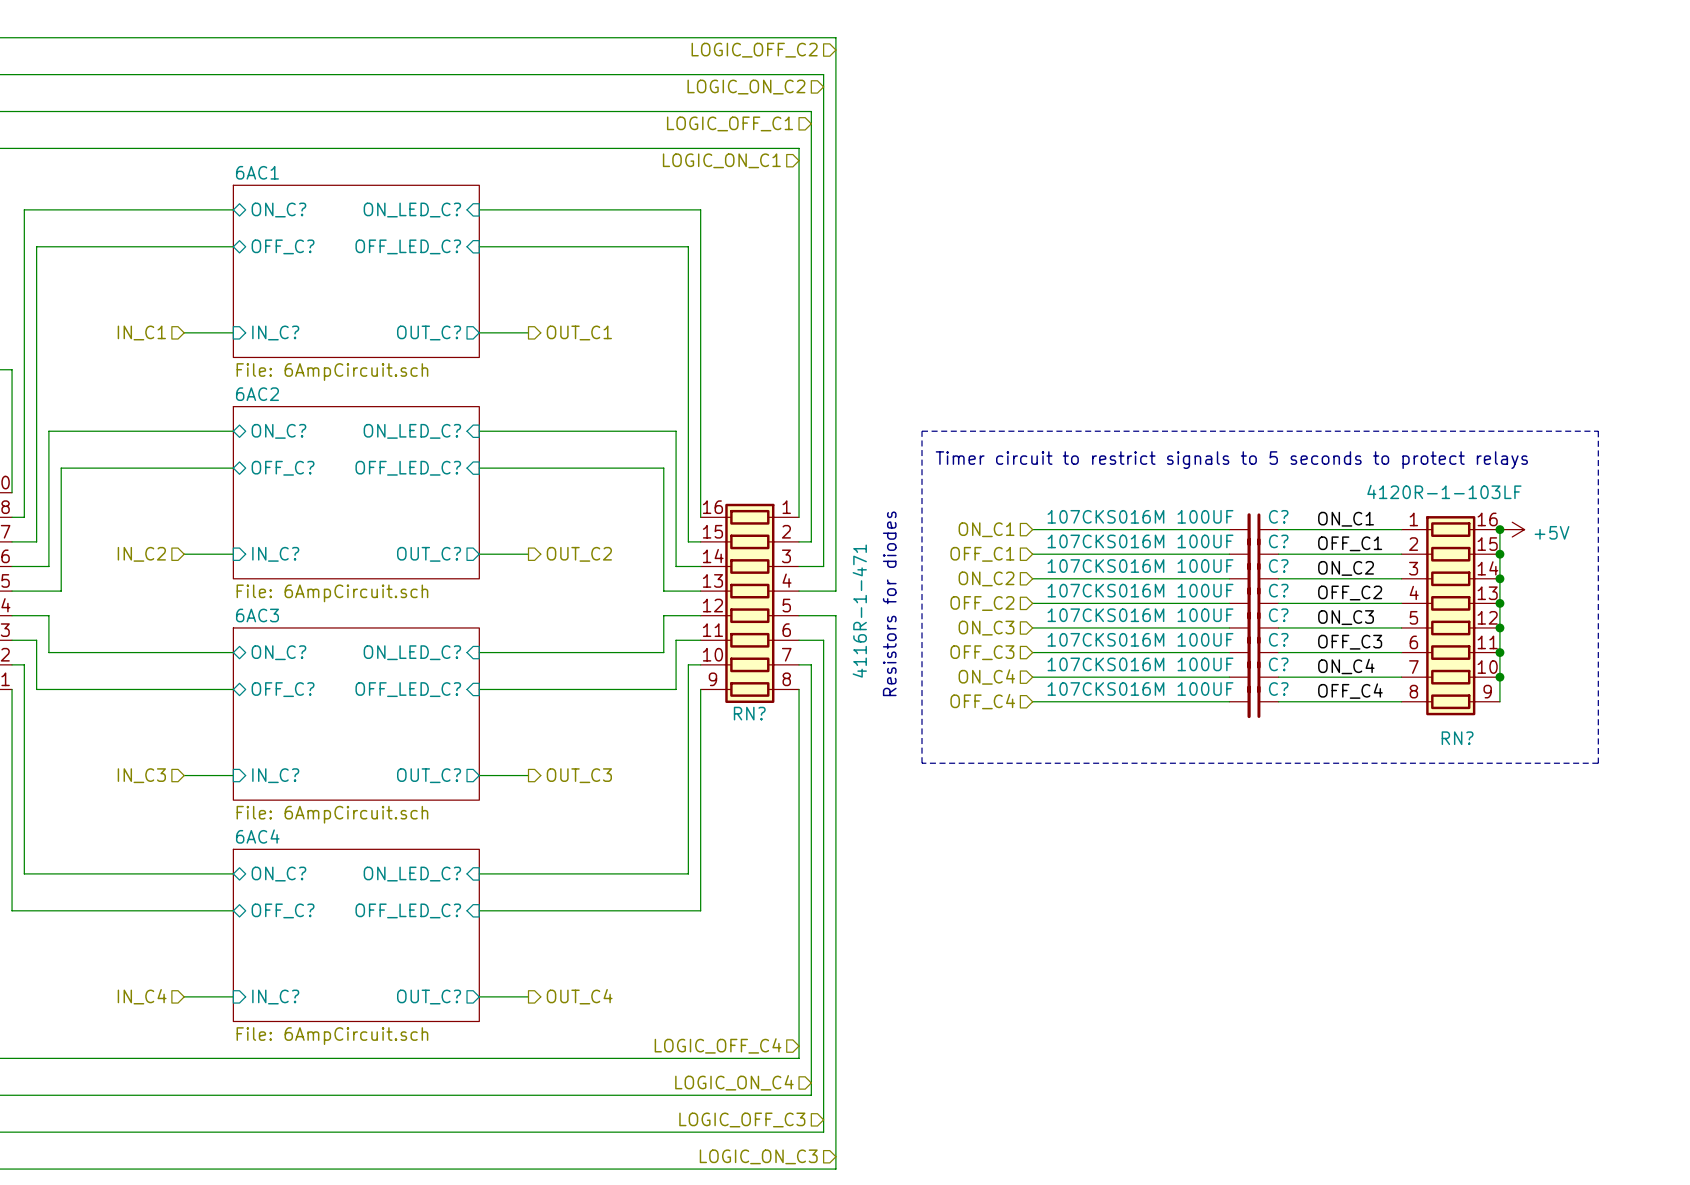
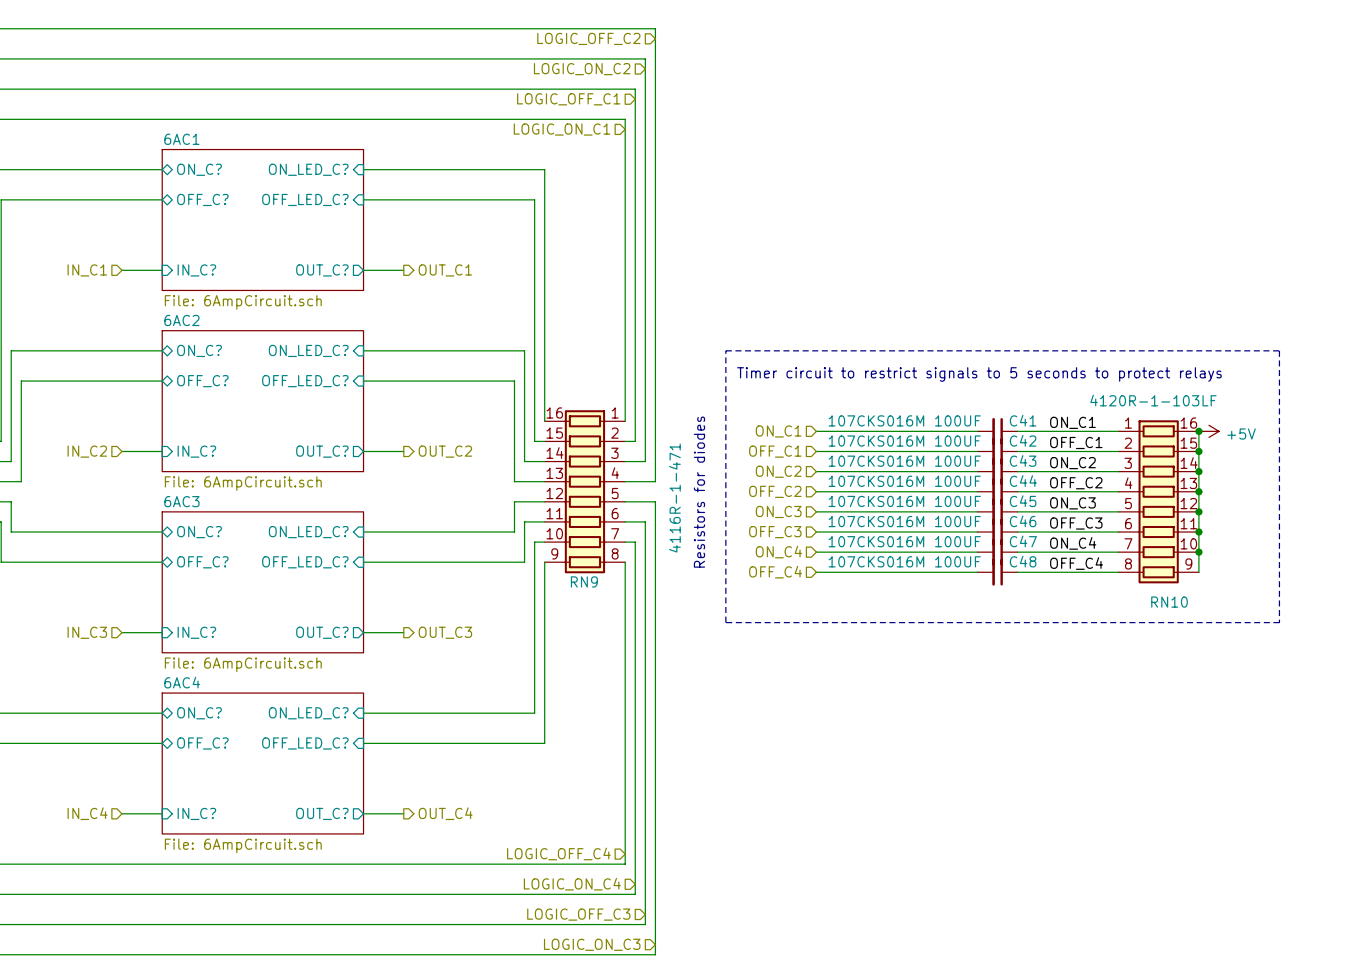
C? name: C? (1278, 516) -> C41 (1023, 420)
C? name: C? (1278, 541) -> C42 (1023, 440)
C? name: C? (1278, 566) -> C43 (1023, 460)
C? name: C? (1278, 590) -> C44 (1023, 481)
C? name: C? (1278, 615) -> C45 (1023, 501)
C? name: C? (1278, 639) -> C46 (1023, 521)
C? name: C? (1278, 664) -> C47 (1023, 541)
C? name: C? (1278, 689) -> C48 (1023, 561)
RN? name: RN? (749, 713) -> RN9 (584, 581)
RN? name: RN? (1457, 738) -> RN10 (1169, 602)

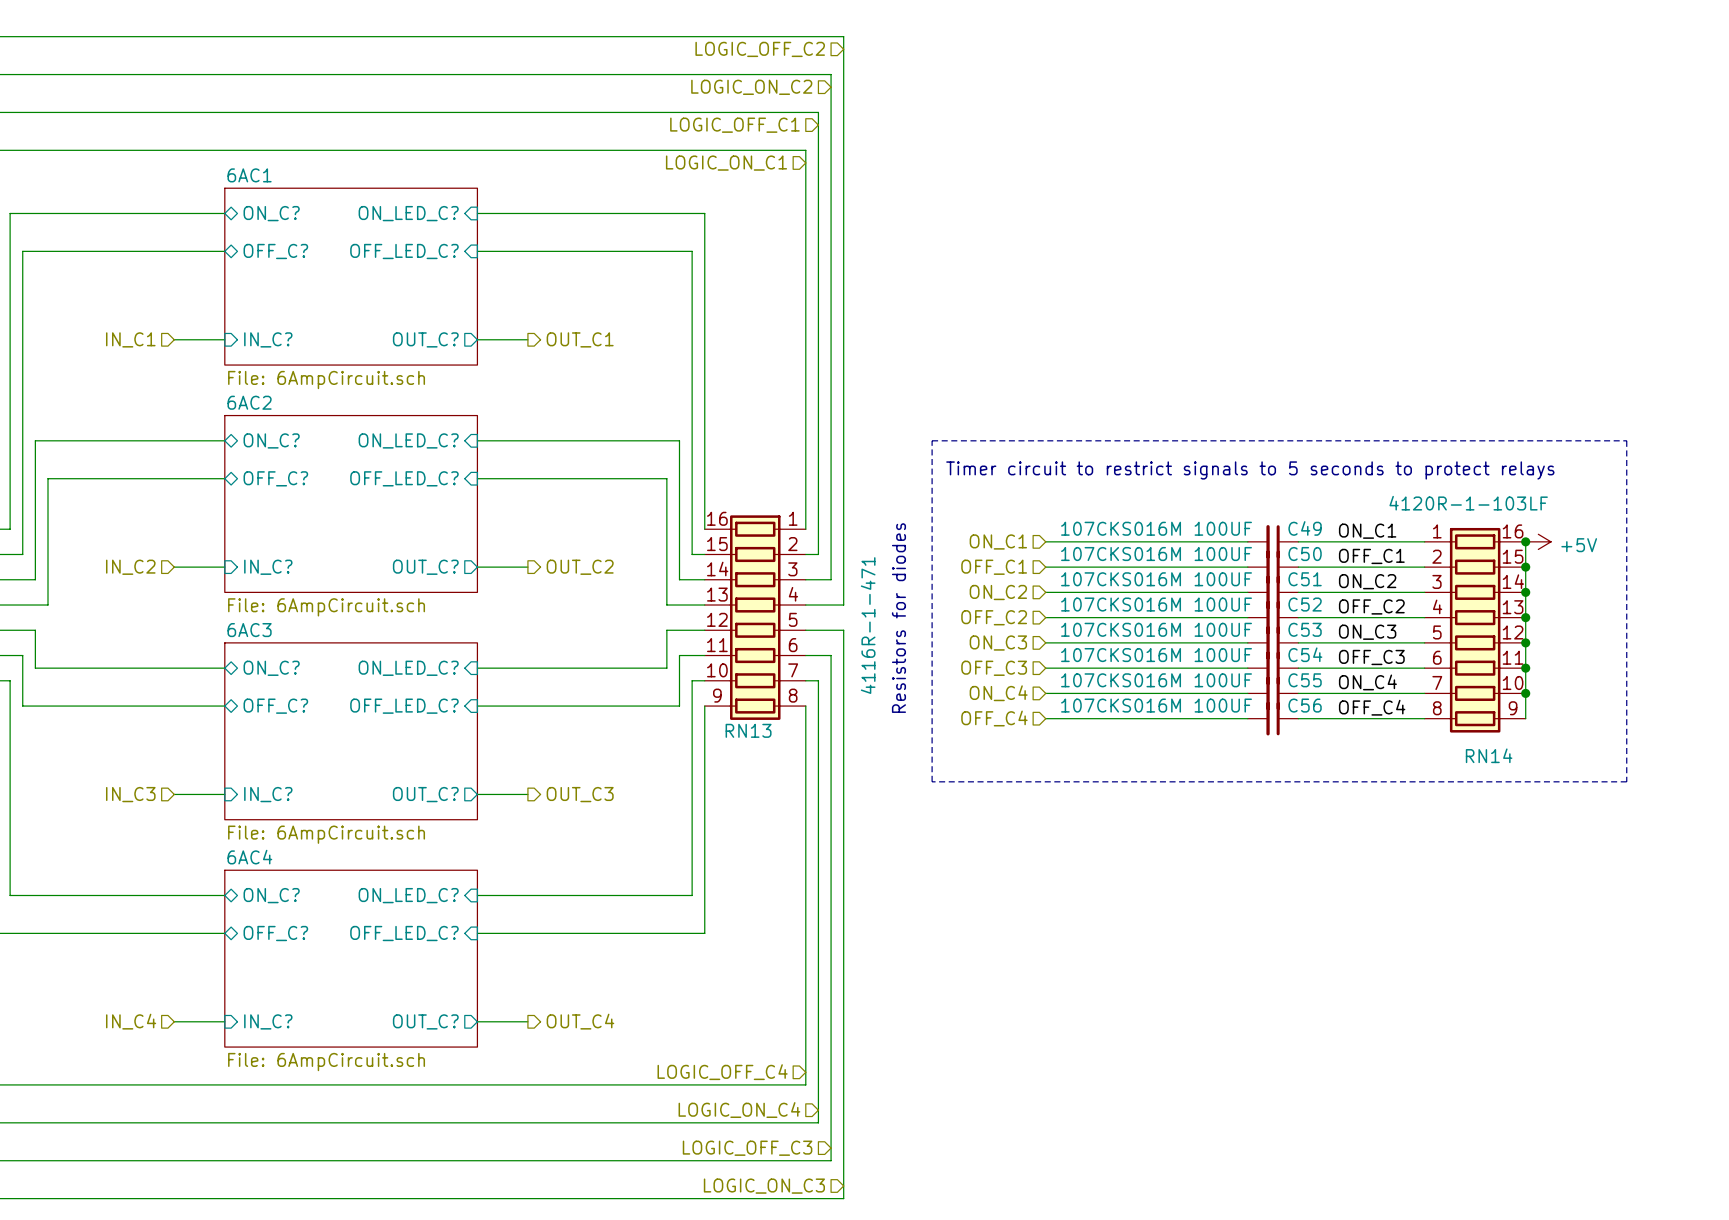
C41 name: C41 (1023, 420) -> C49 (1305, 528)
C42 name: C42 (1023, 440) -> C50 (1305, 554)
C43 name: C43 (1023, 460) -> C51 (1305, 579)
C44 name: C44 (1023, 481) -> C52 (1305, 604)
C45 name: C45 (1023, 501) -> C53 (1305, 629)
C46 name: C46 (1023, 521) -> C54 (1305, 654)
C47 name: C47 (1023, 541) -> C55 (1305, 680)
C48 name: C48 (1023, 561) -> C56 (1305, 705)
RN9 name: RN9 (584, 581) -> RN13 (748, 730)
RN10 name: RN10 (1169, 602) -> RN14 (1489, 755)

